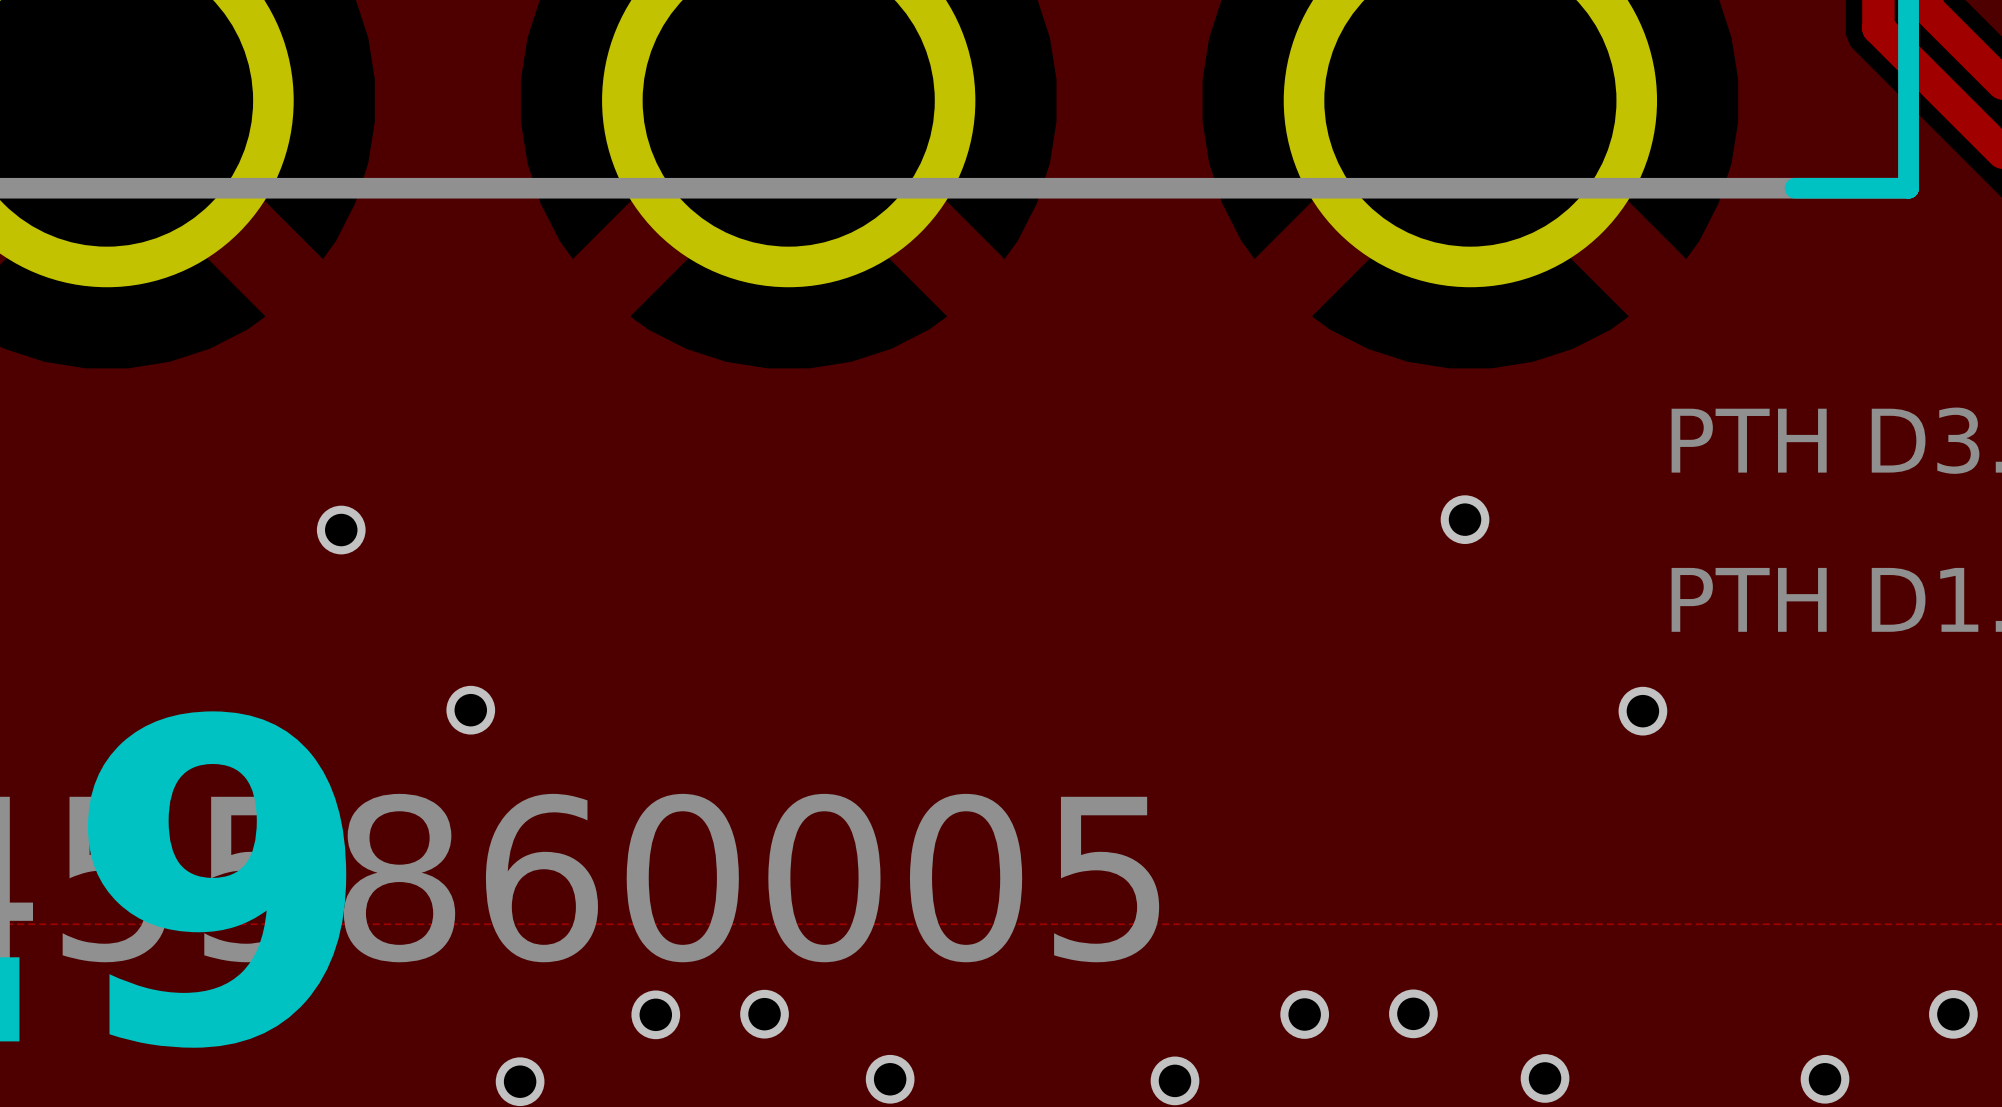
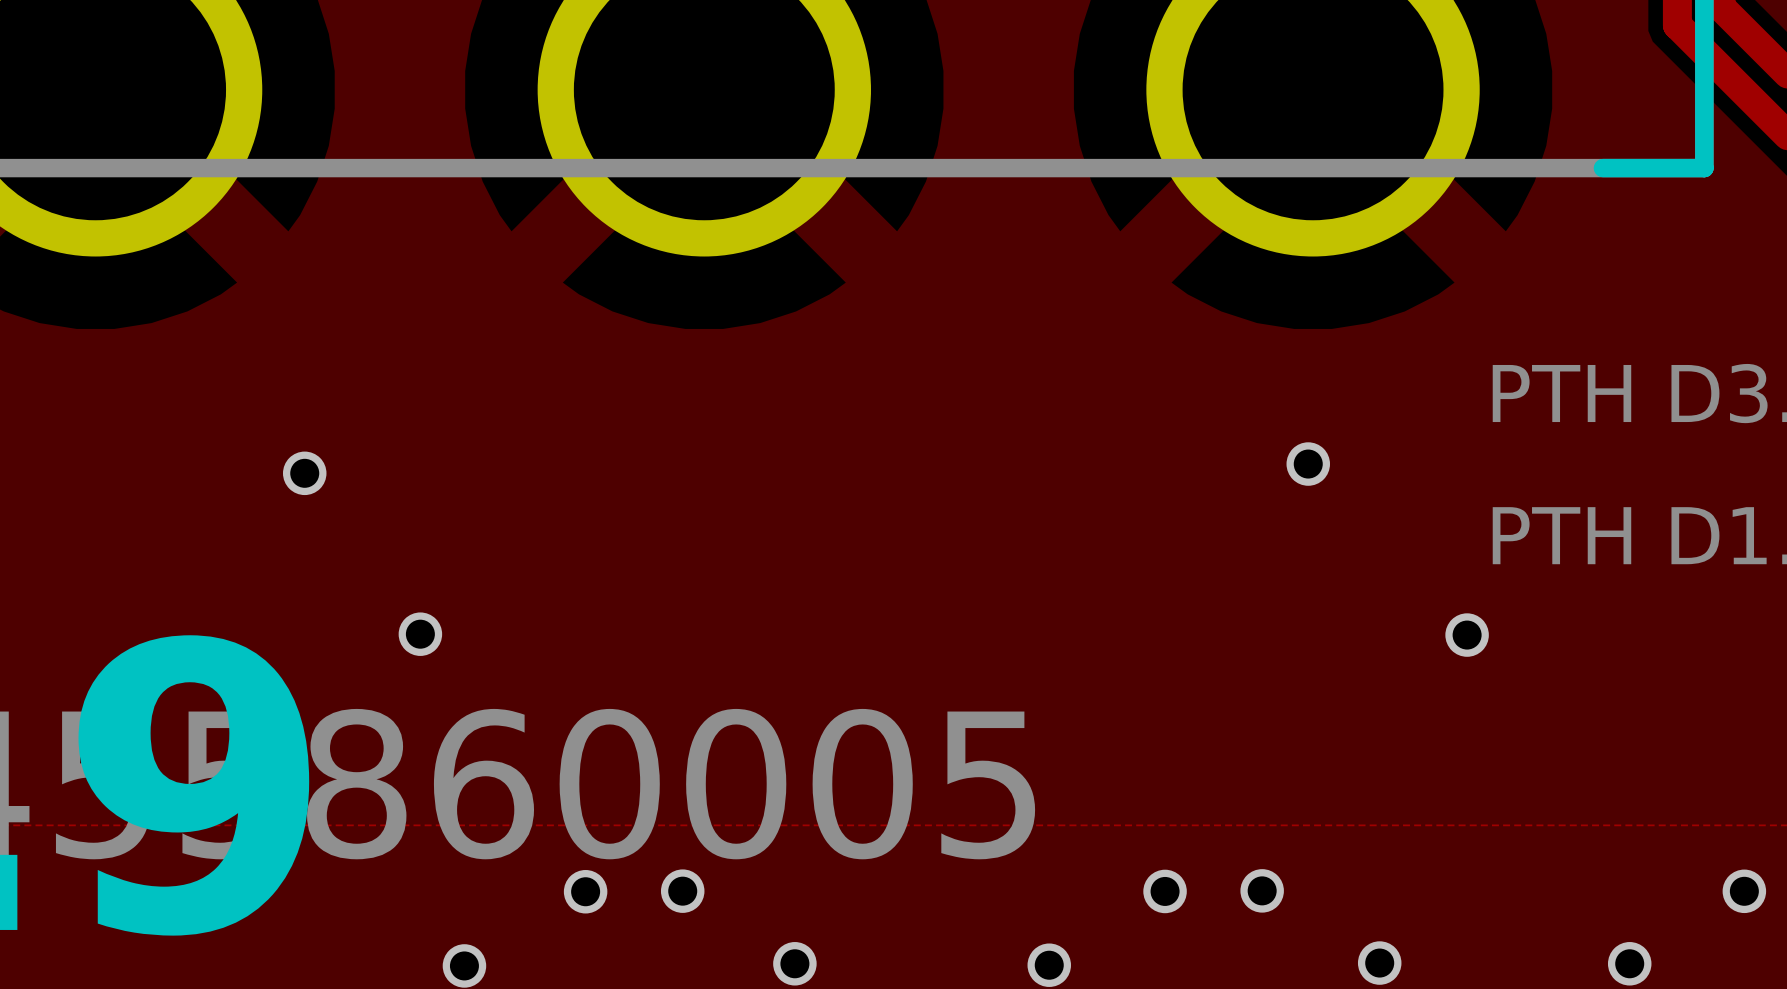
via position: (1413, 1013) -> (1262, 890)
via position: (655, 1014) -> (585, 891)
via position: (764, 1014) -> (682, 891)
via position: (1304, 1014) -> (1165, 891)
via position: (1953, 1014) -> (1744, 891)

